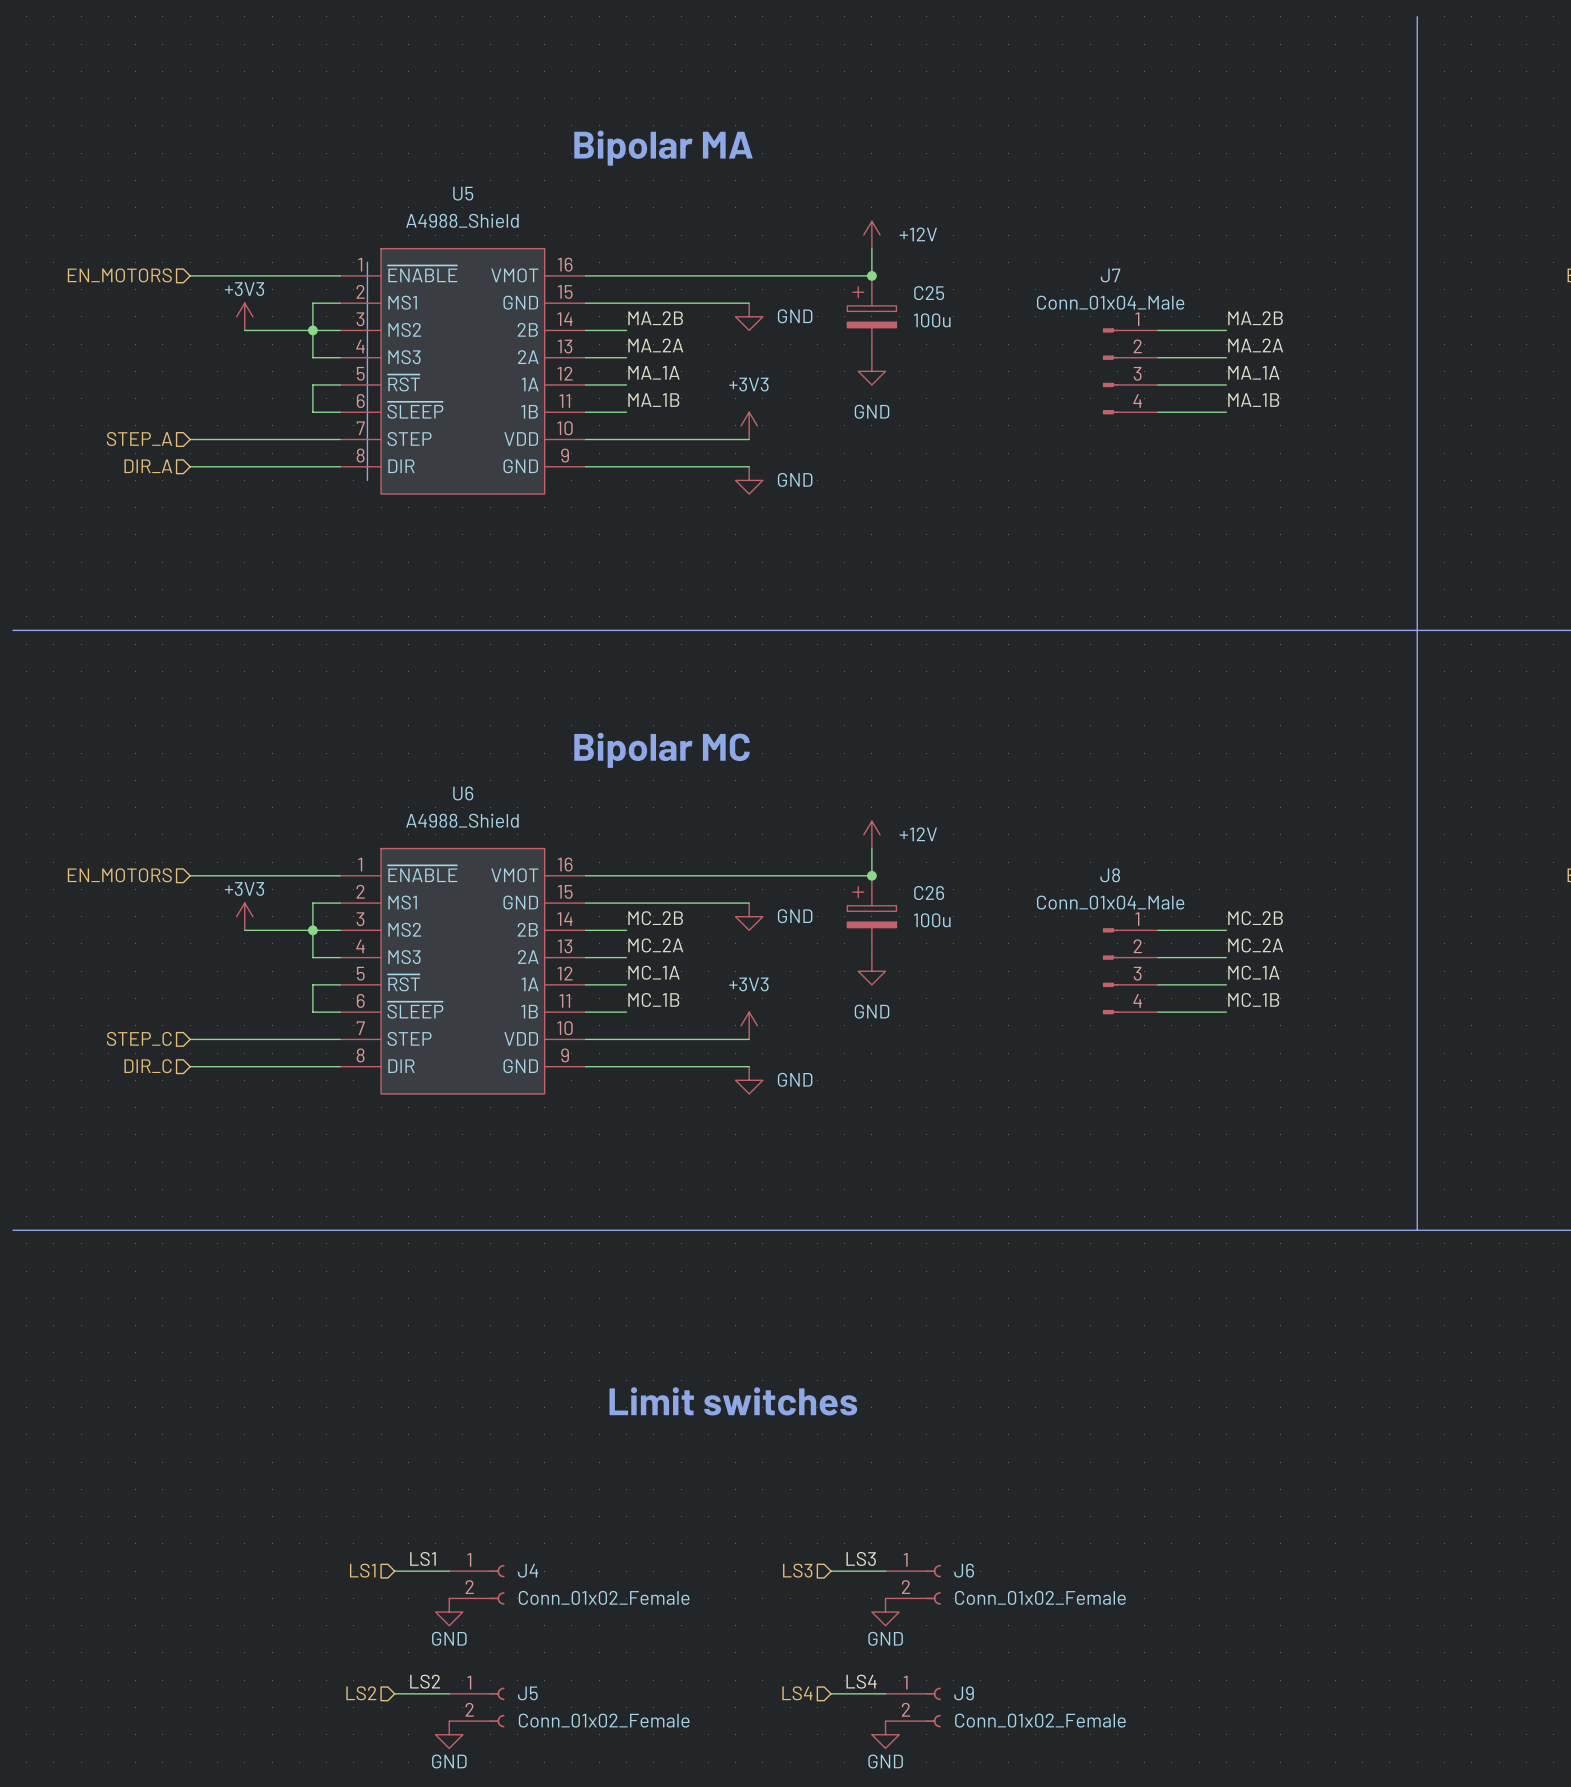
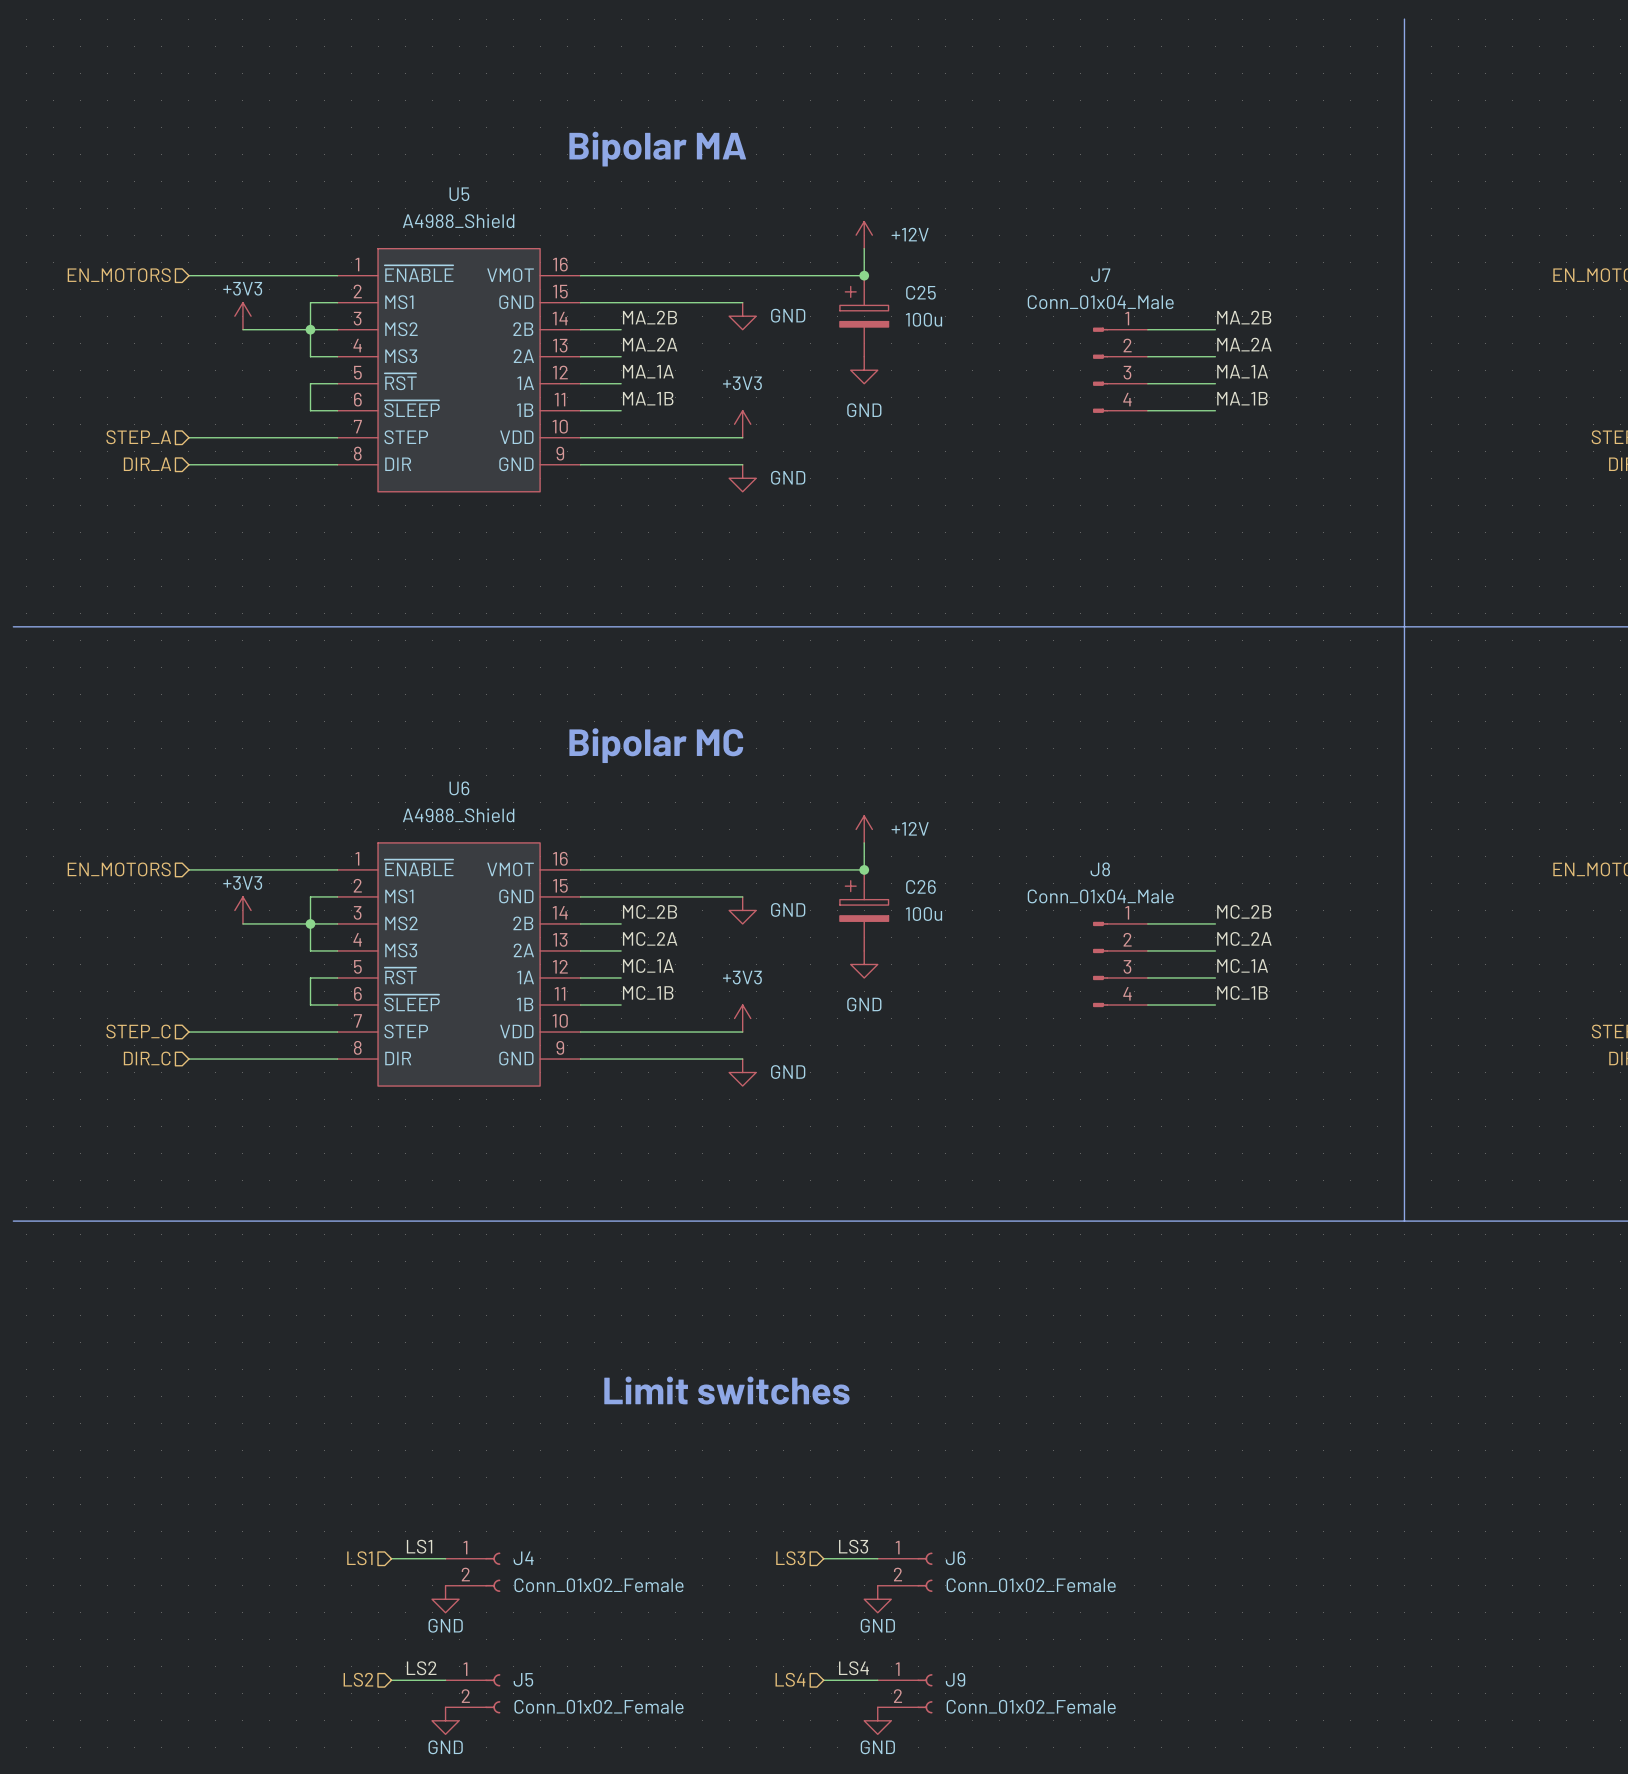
line: (367, 262) (367, 480) -> none

